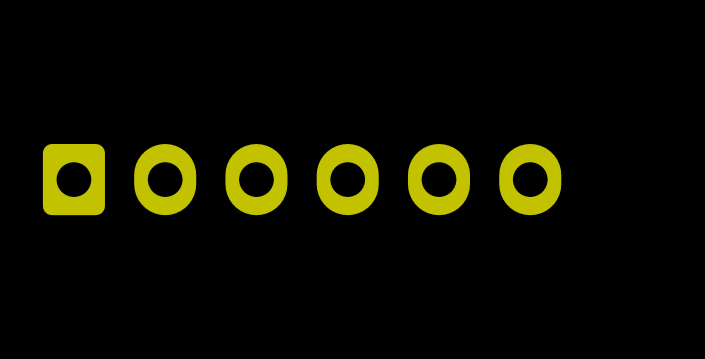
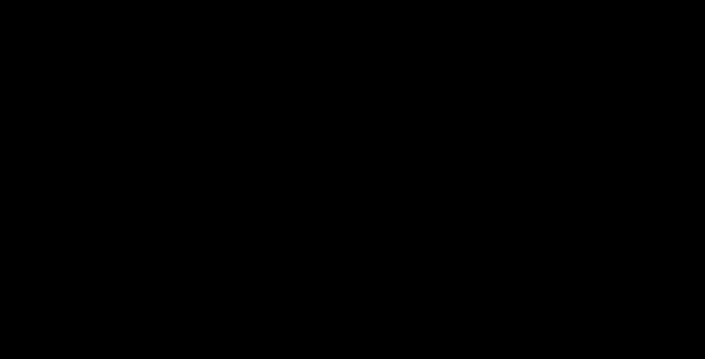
part: (302, 179) -> none

